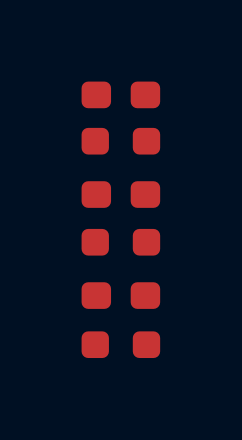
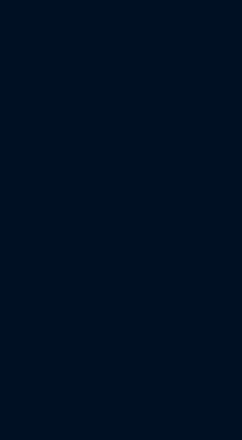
part: (120, 94) -> none
part: (120, 141) -> none
part: (120, 194) -> none
part: (120, 242) -> none
part: (120, 295) -> none
part: (120, 344) -> none

